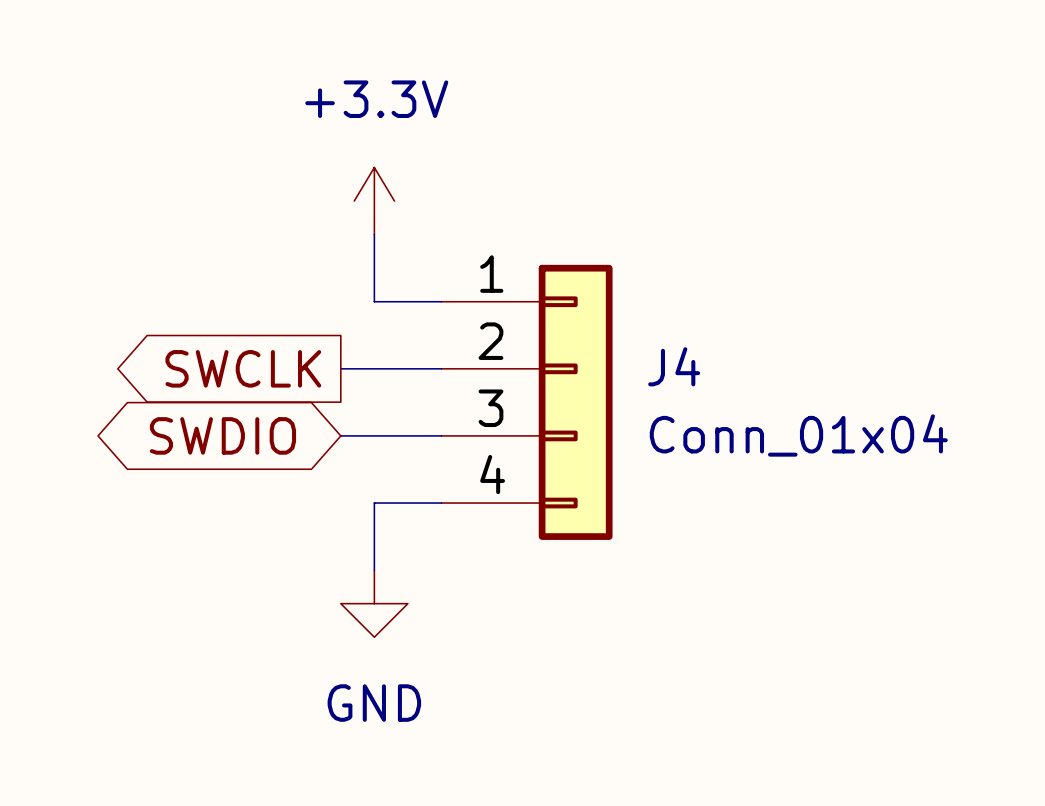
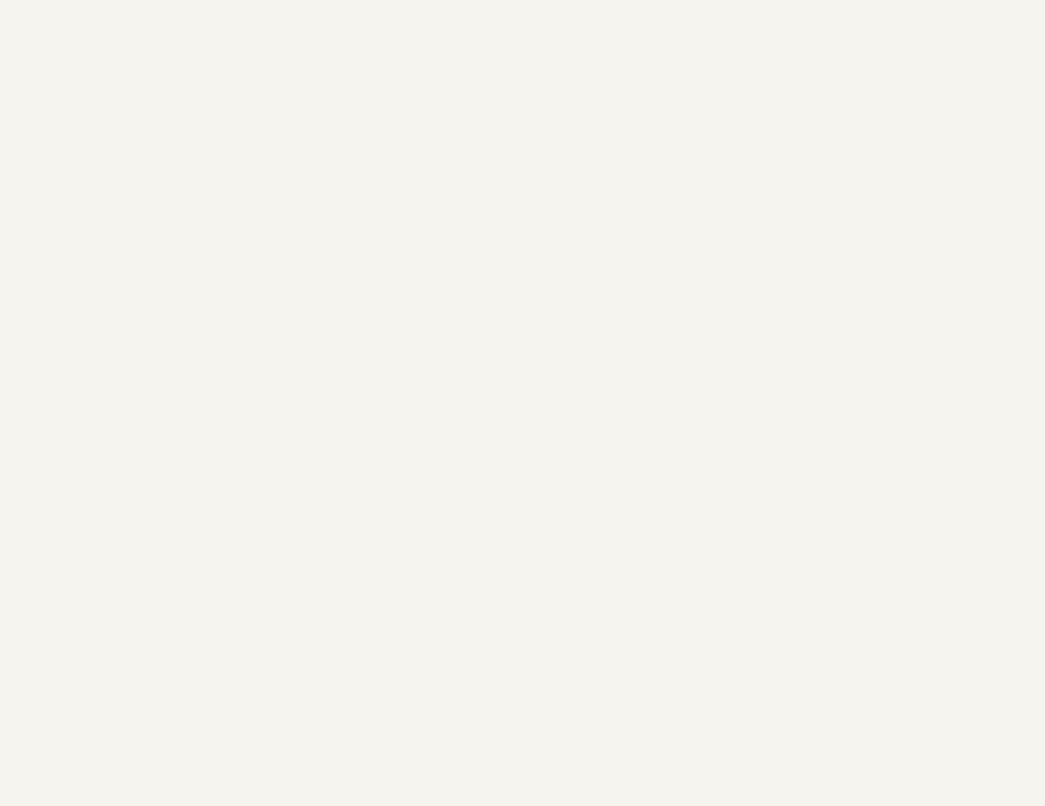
power symbol: +3.3V (374, 201) -> none
wire: (374, 234) (374, 301) (441, 301) -> none
global label: SWCLK (243, 368) -> none
wire: (340, 368) (441, 368) -> none
J4: Conn_01x04 (527, 402) -> none
global label: SWDIO (222, 435) -> none
wire: (340, 435) (441, 435) -> none
wire: (441, 503) (374, 503) (374, 570) -> none
power symbol: GND (374, 603) -> none

